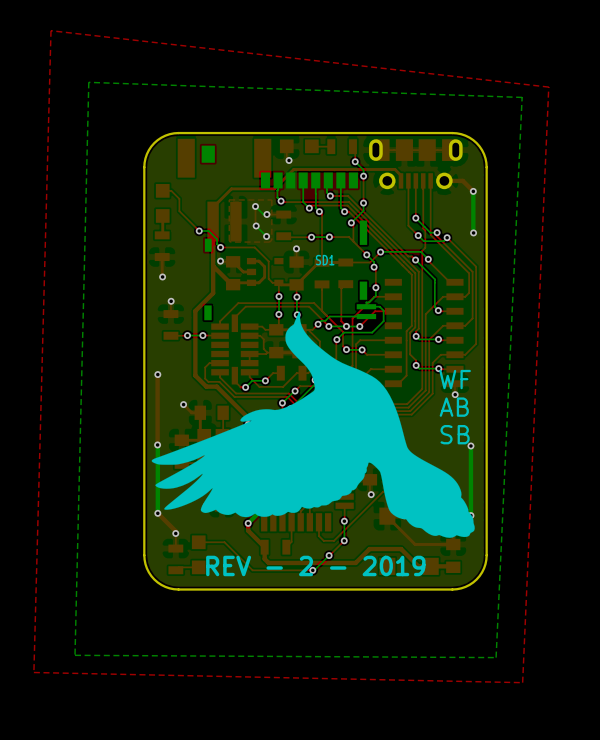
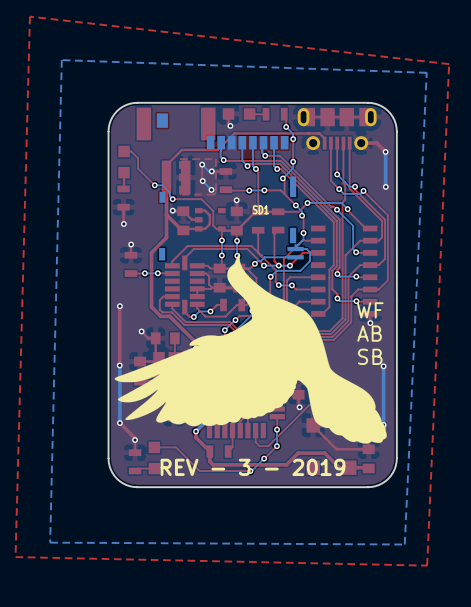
text: REV - 2 - 2019 (315, 565) -> REV - 3 - 2019 (252, 467)

